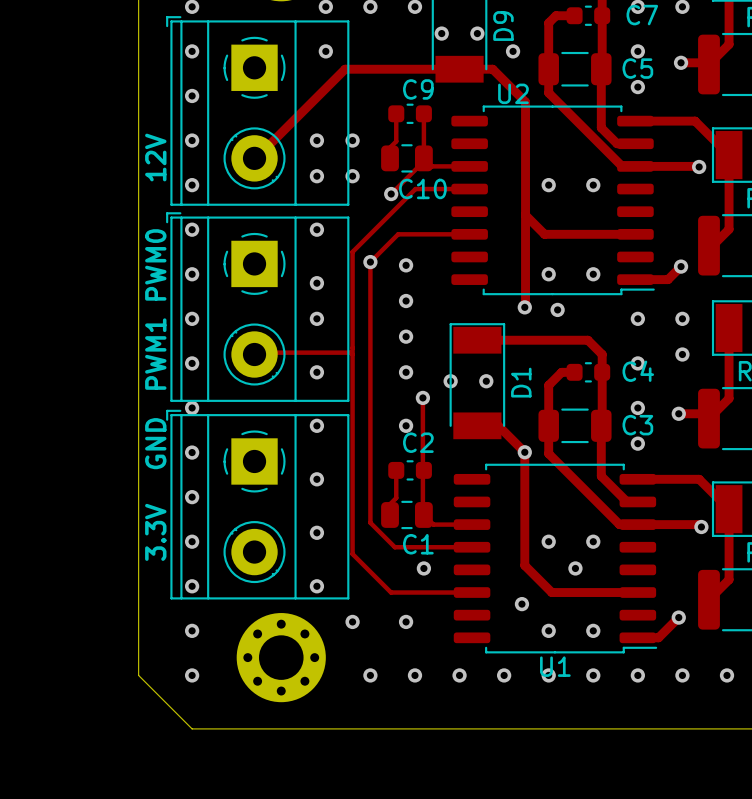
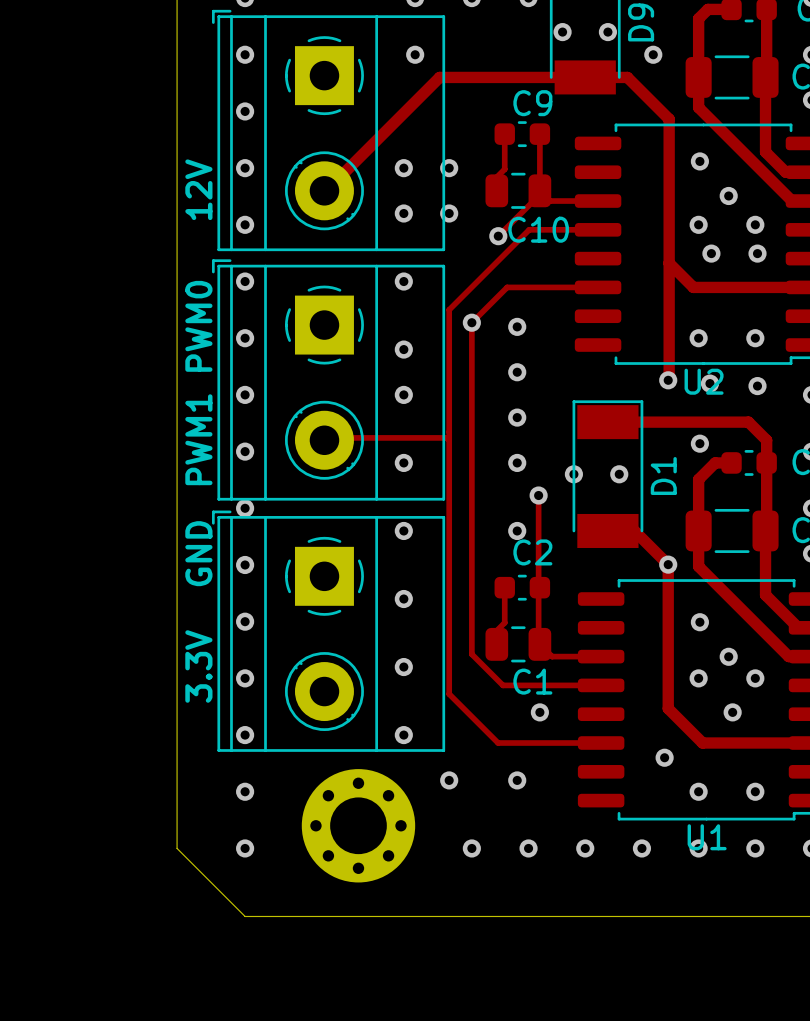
U2 name position: U2 (513, 93) -> U2 (704, 381)
via: none -> (699, 161)
via: none -> (728, 195)
via: none -> (711, 253)
via: none -> (757, 253)
via: none -> (757, 386)
via: none -> (699, 443)
via: none -> (699, 622)
via: none -> (728, 656)

